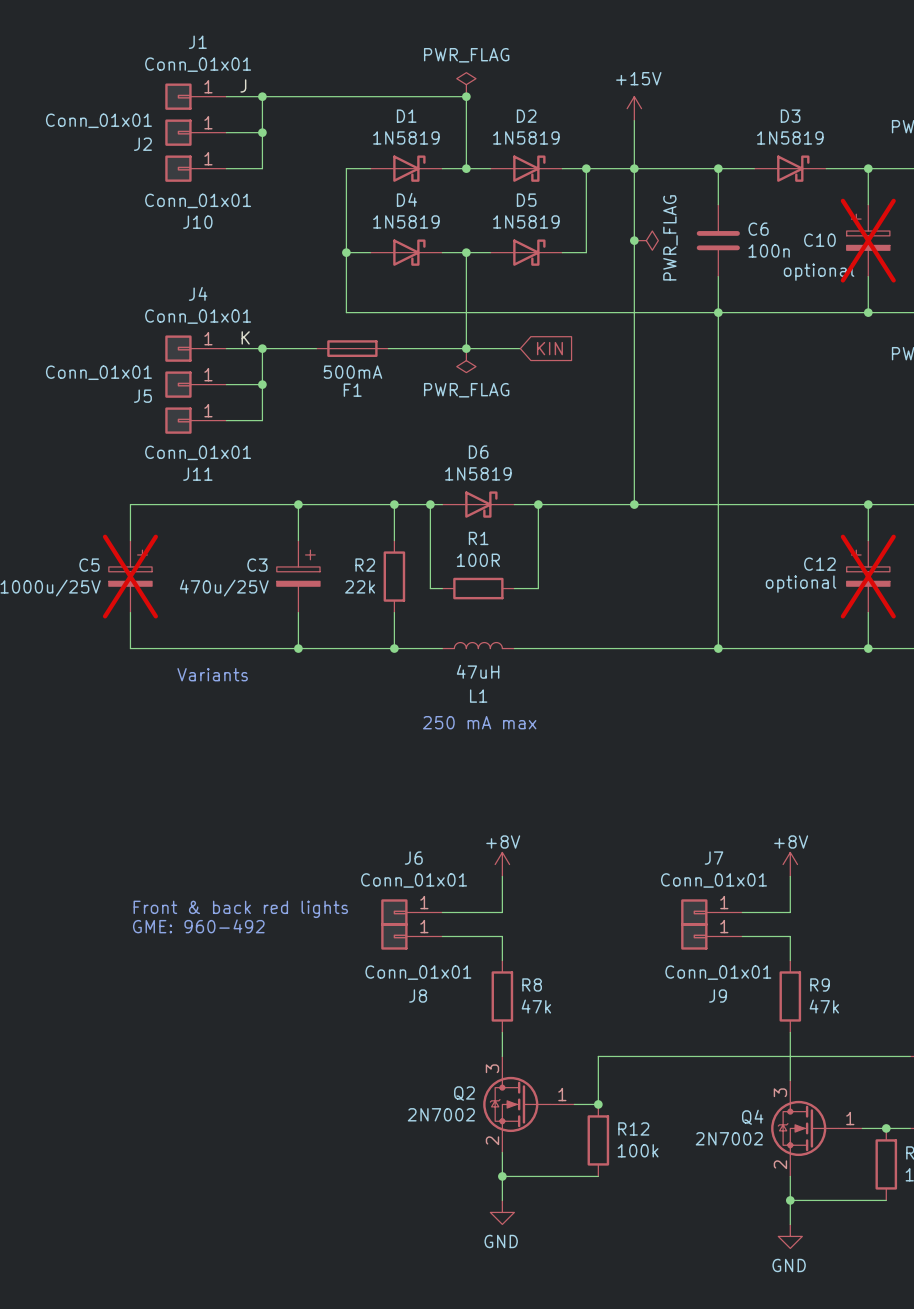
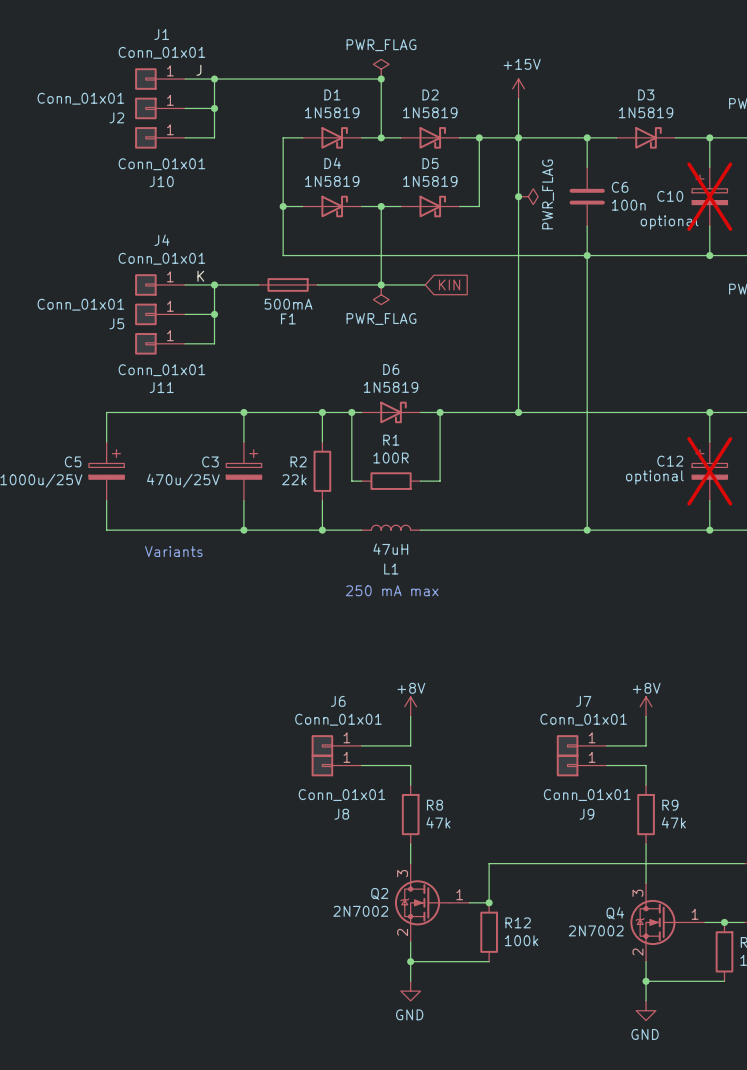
C5 do-not-place cross: (130, 576) -> none
text: Front & back red lights (240, 909) -> none
text: GME: 960-492 (198, 926) -> none

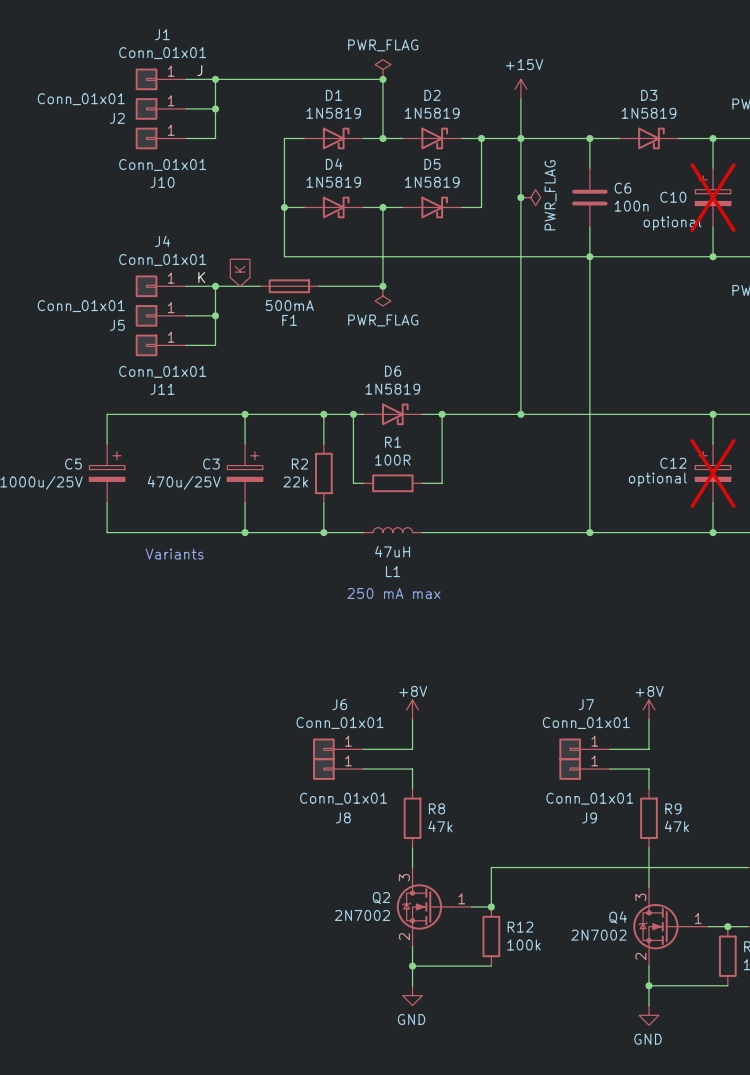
global label: none -> K (240, 269)
wire: (381, 284) (425, 284) -> none
global label: KIN (449, 284) -> none

